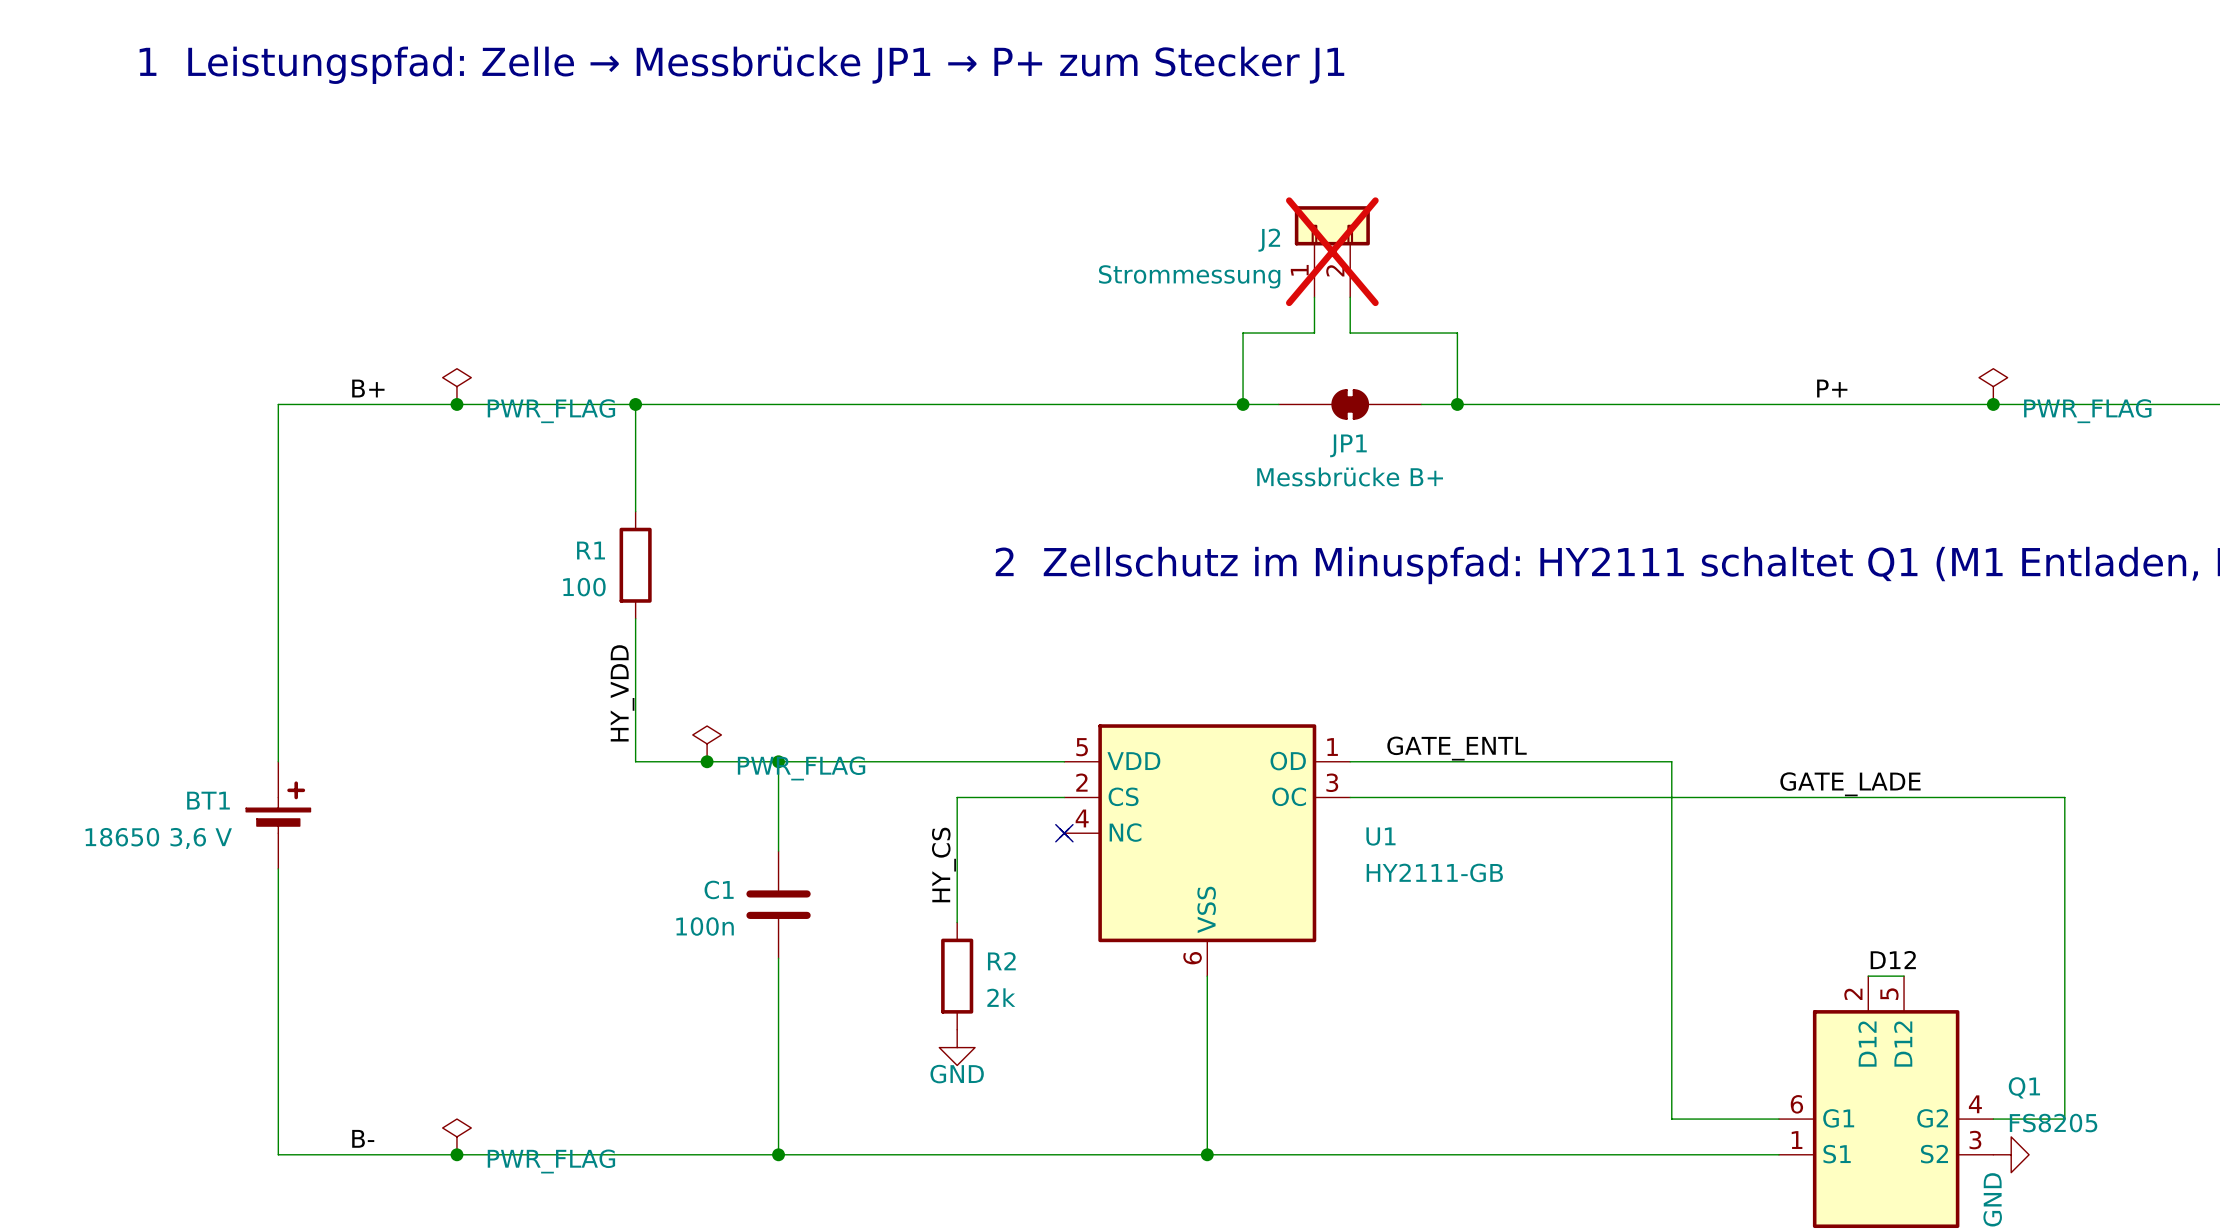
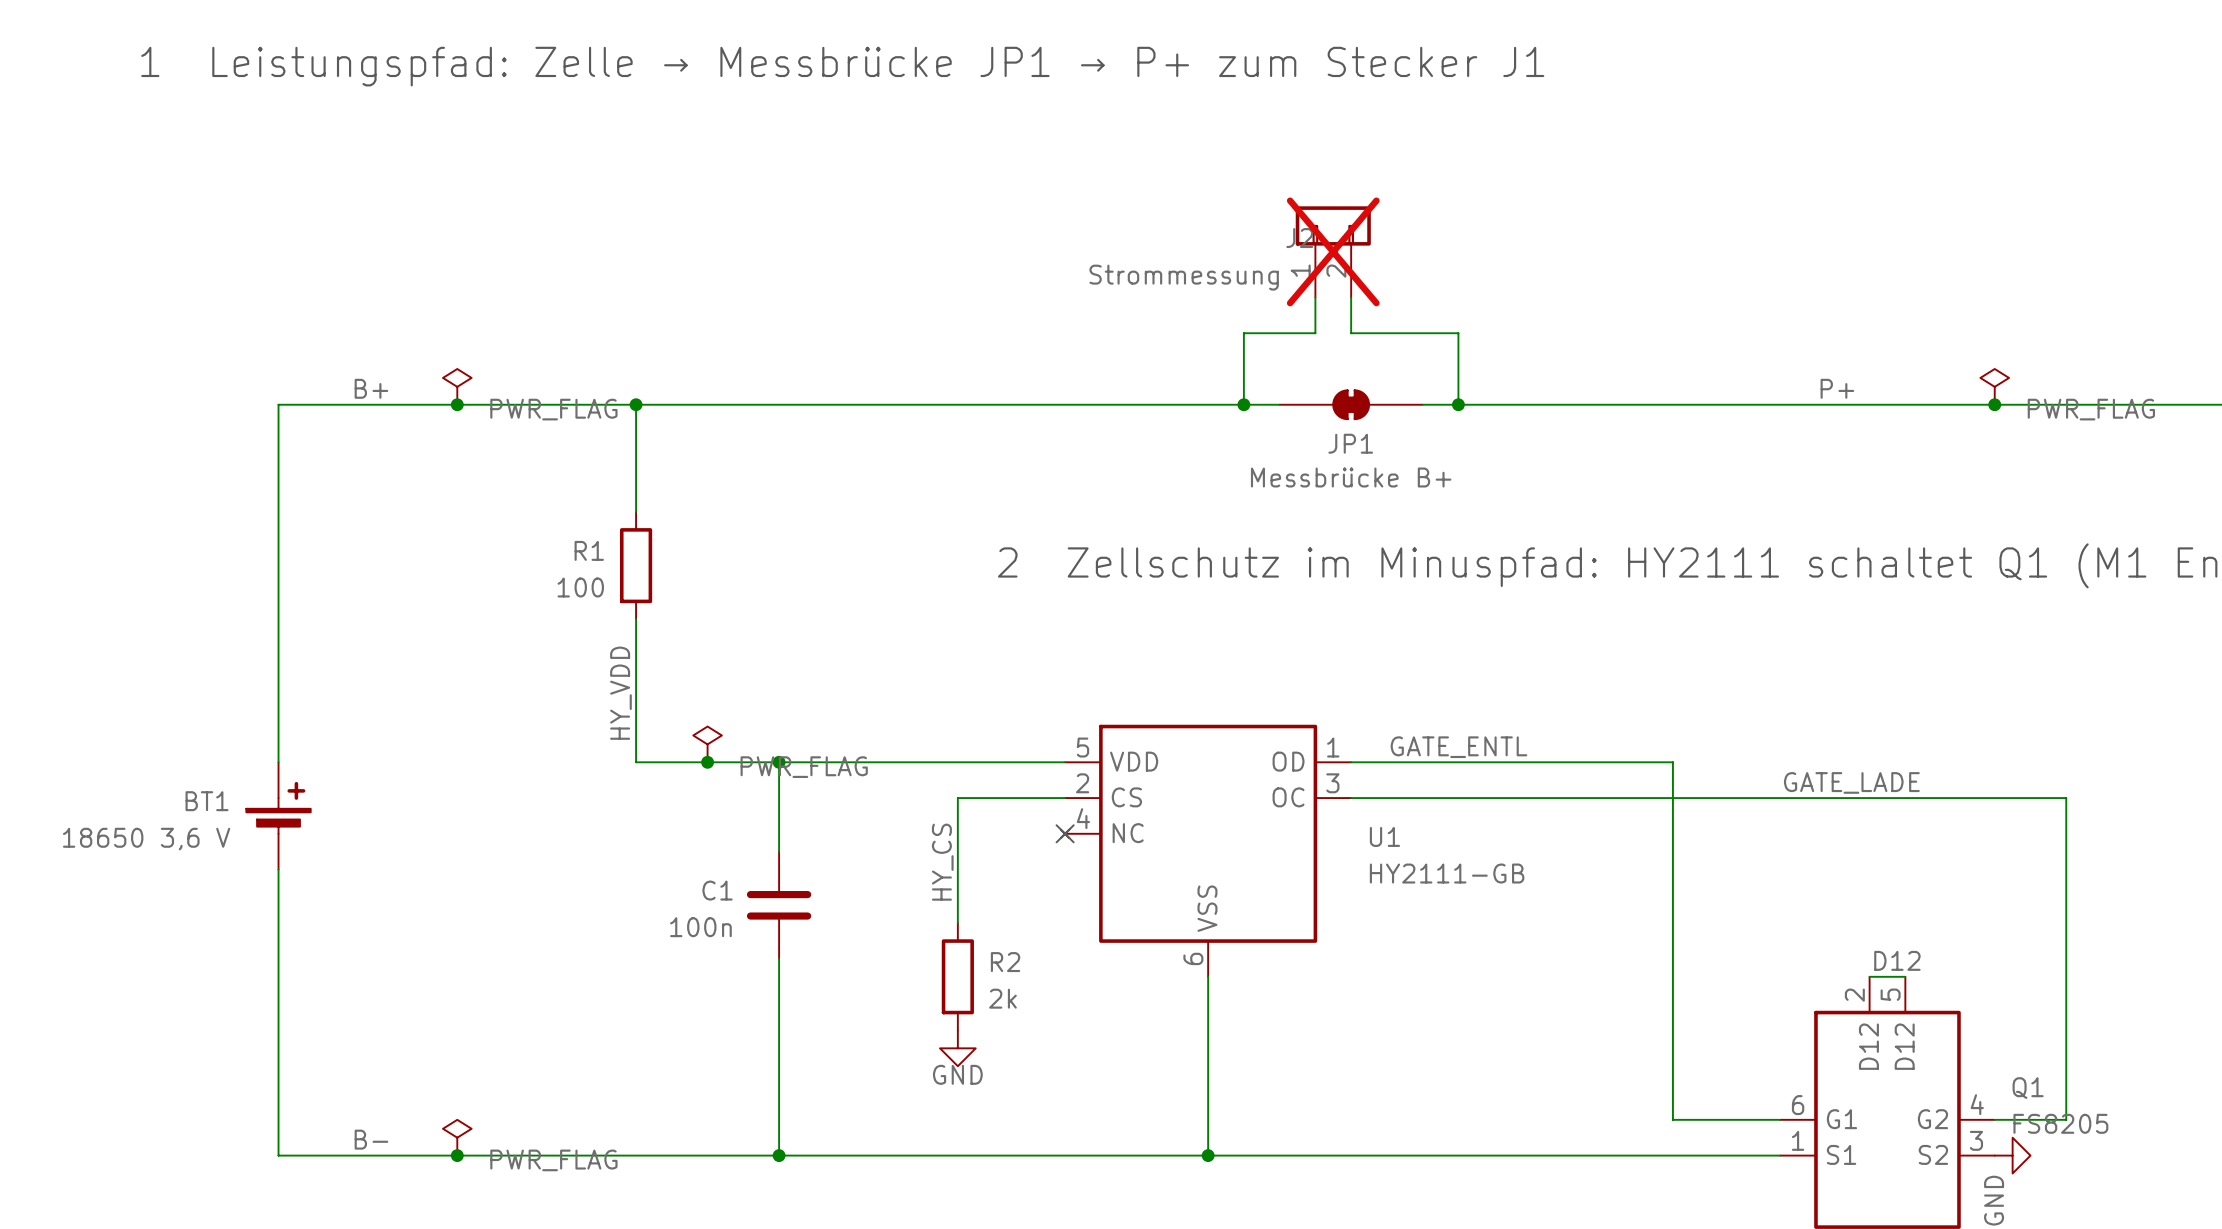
J2 name position: J2 (1269, 240) -> J2 (1299, 238)

